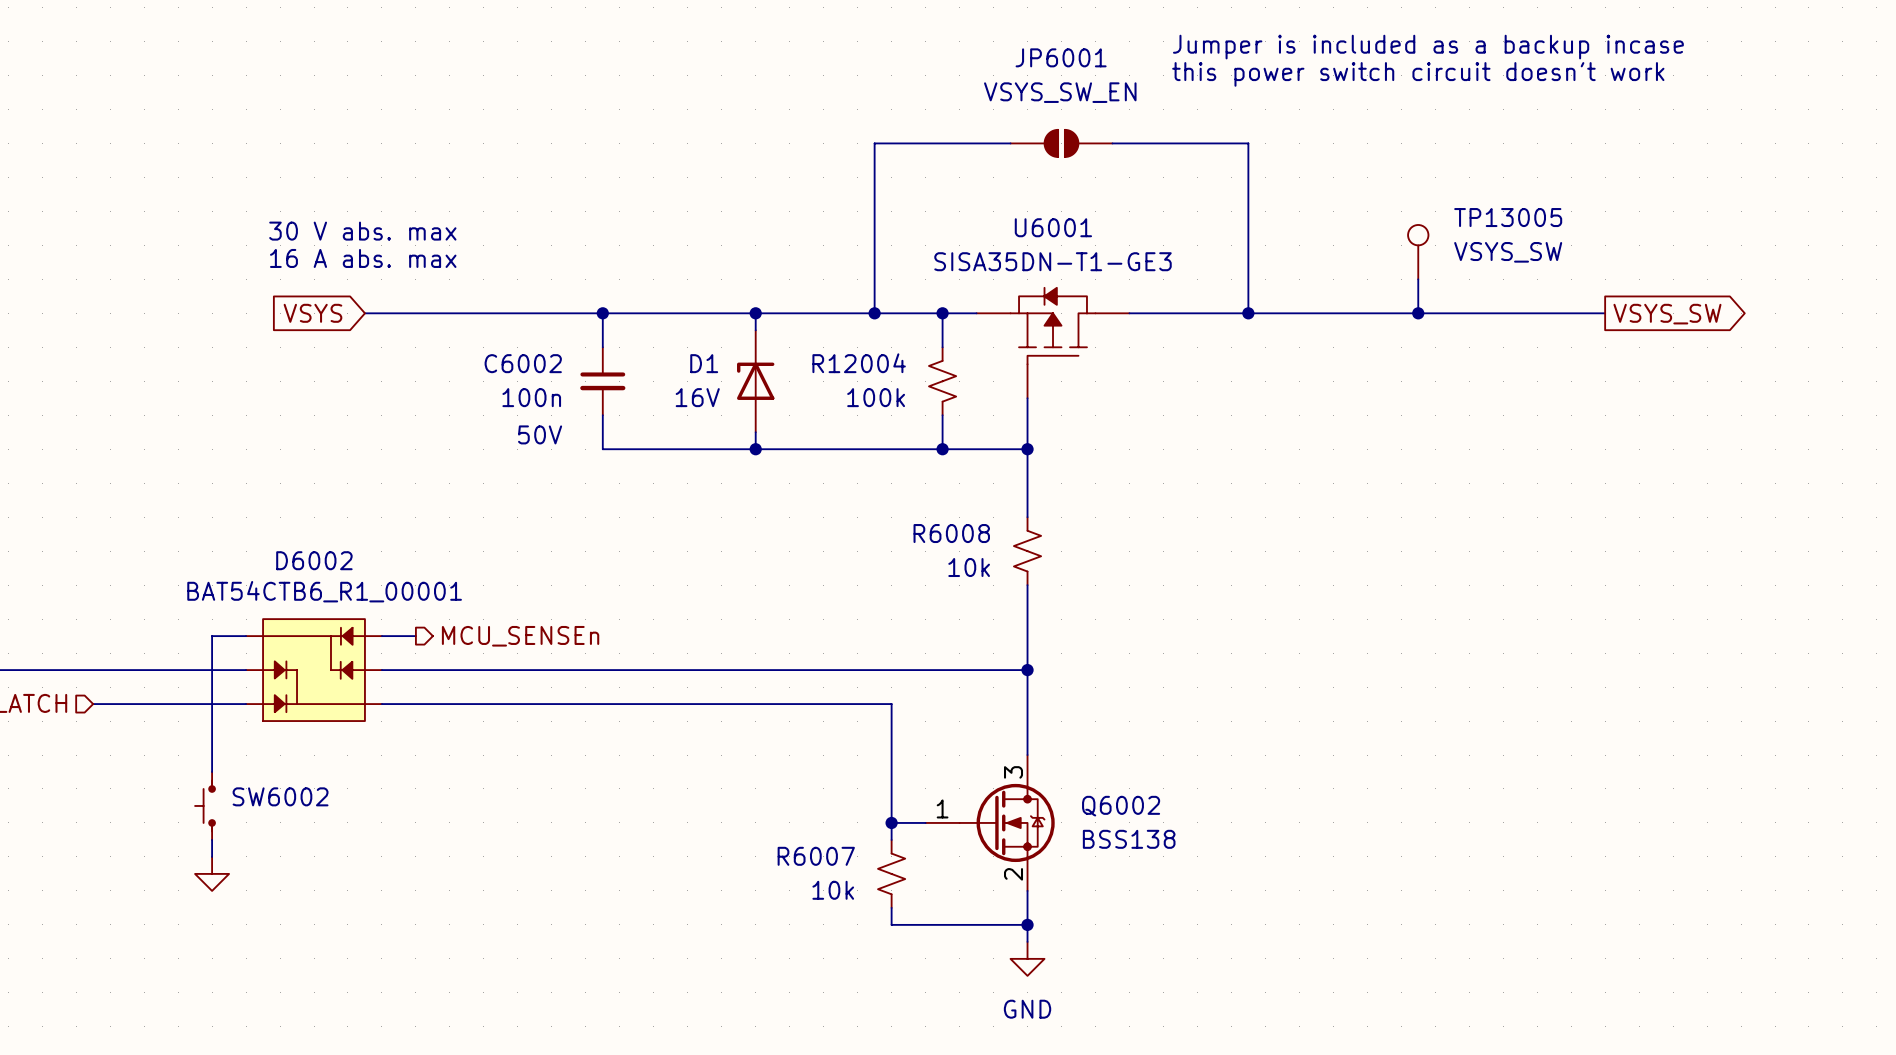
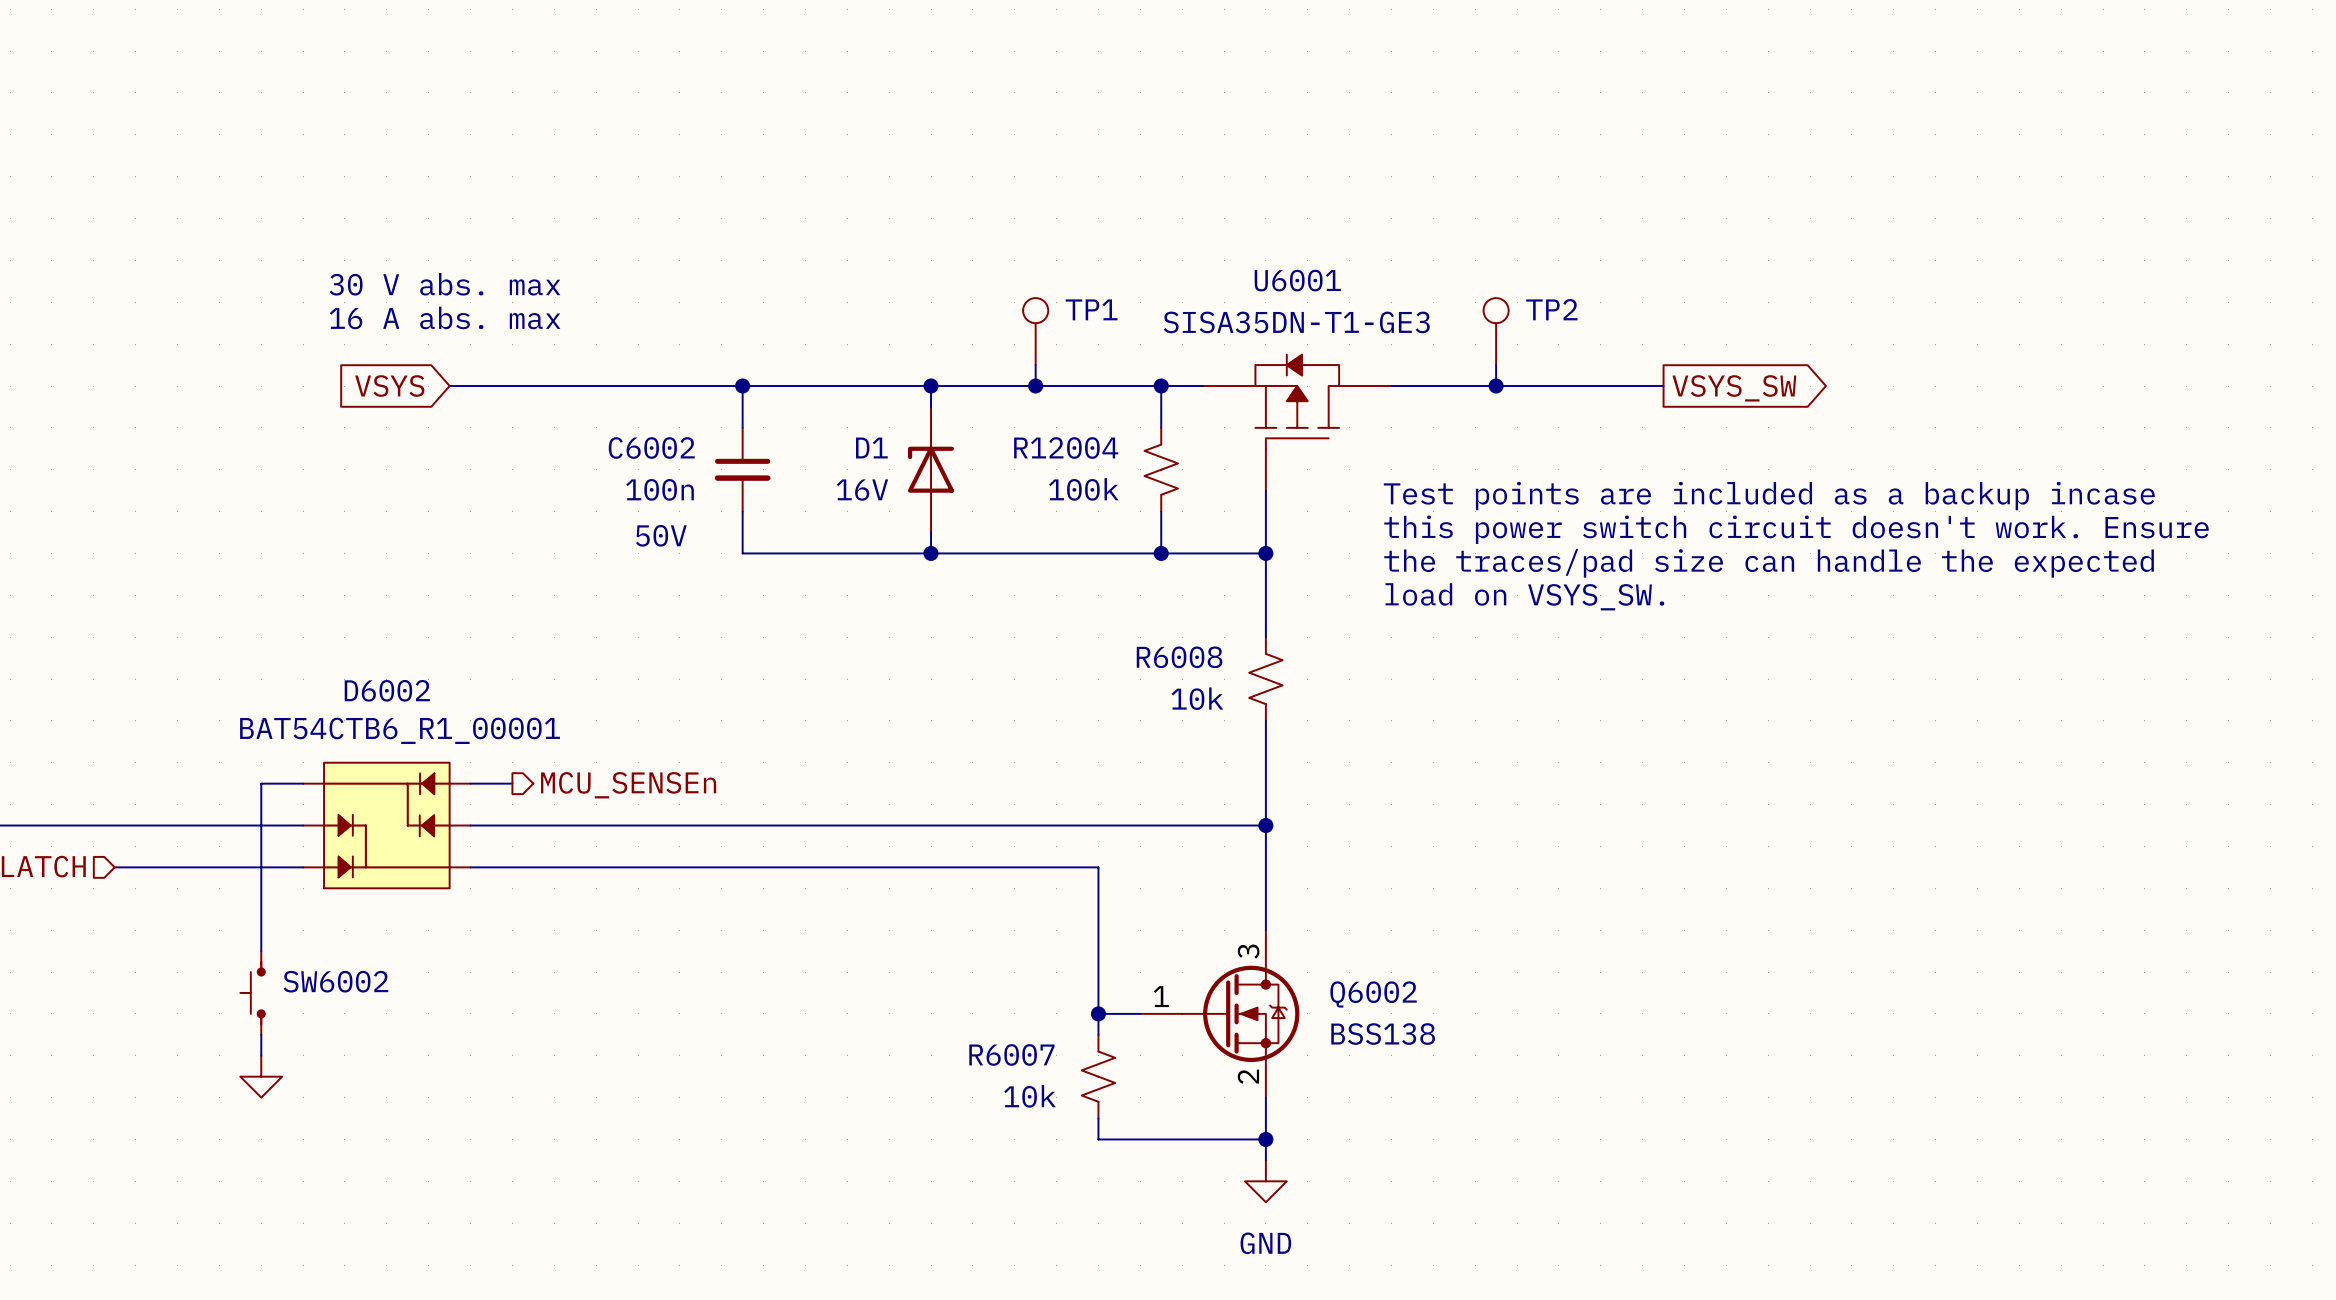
text: Jumper is included as a backup incase (1428, 47) -> none
text: this power switch circuit doesn't work (1418, 74) -> none
wire: (1010, 143) (874, 143) (874, 313) -> none
JP6001: VSYS_SW_EN (1061, 143) -> none
wire: (1112, 143) (1248, 143) (1248, 313) -> none
TP13005: VSYS_SW (1418, 252) -> none
TP1: none -> (1035, 331)
TP2: none -> (1496, 331)
wire: (1418, 279) (1418, 313) -> none
wire: none -> (1035, 365) (1035, 386)
wire: none -> (1496, 365) (1496, 386)
junction position: (874, 313) -> (1035, 386)
junction position: (1248, 313) -> (1496, 386)
wire: (1350, 313) (1605, 313) -> none
junction: (1418, 313) -> none
global label position: VSYS_SW (1667, 314) -> VSYS_SW (1734, 388)
text: none -> Test points are included as a backup incase (1769, 496)
text: none -> this power switch circuit doesn't work. Ensure (1796, 529)
text: none -> the traces/pad size can handle the expected (1769, 563)
text: none -> load on VSYS_SW. (1524, 596)

